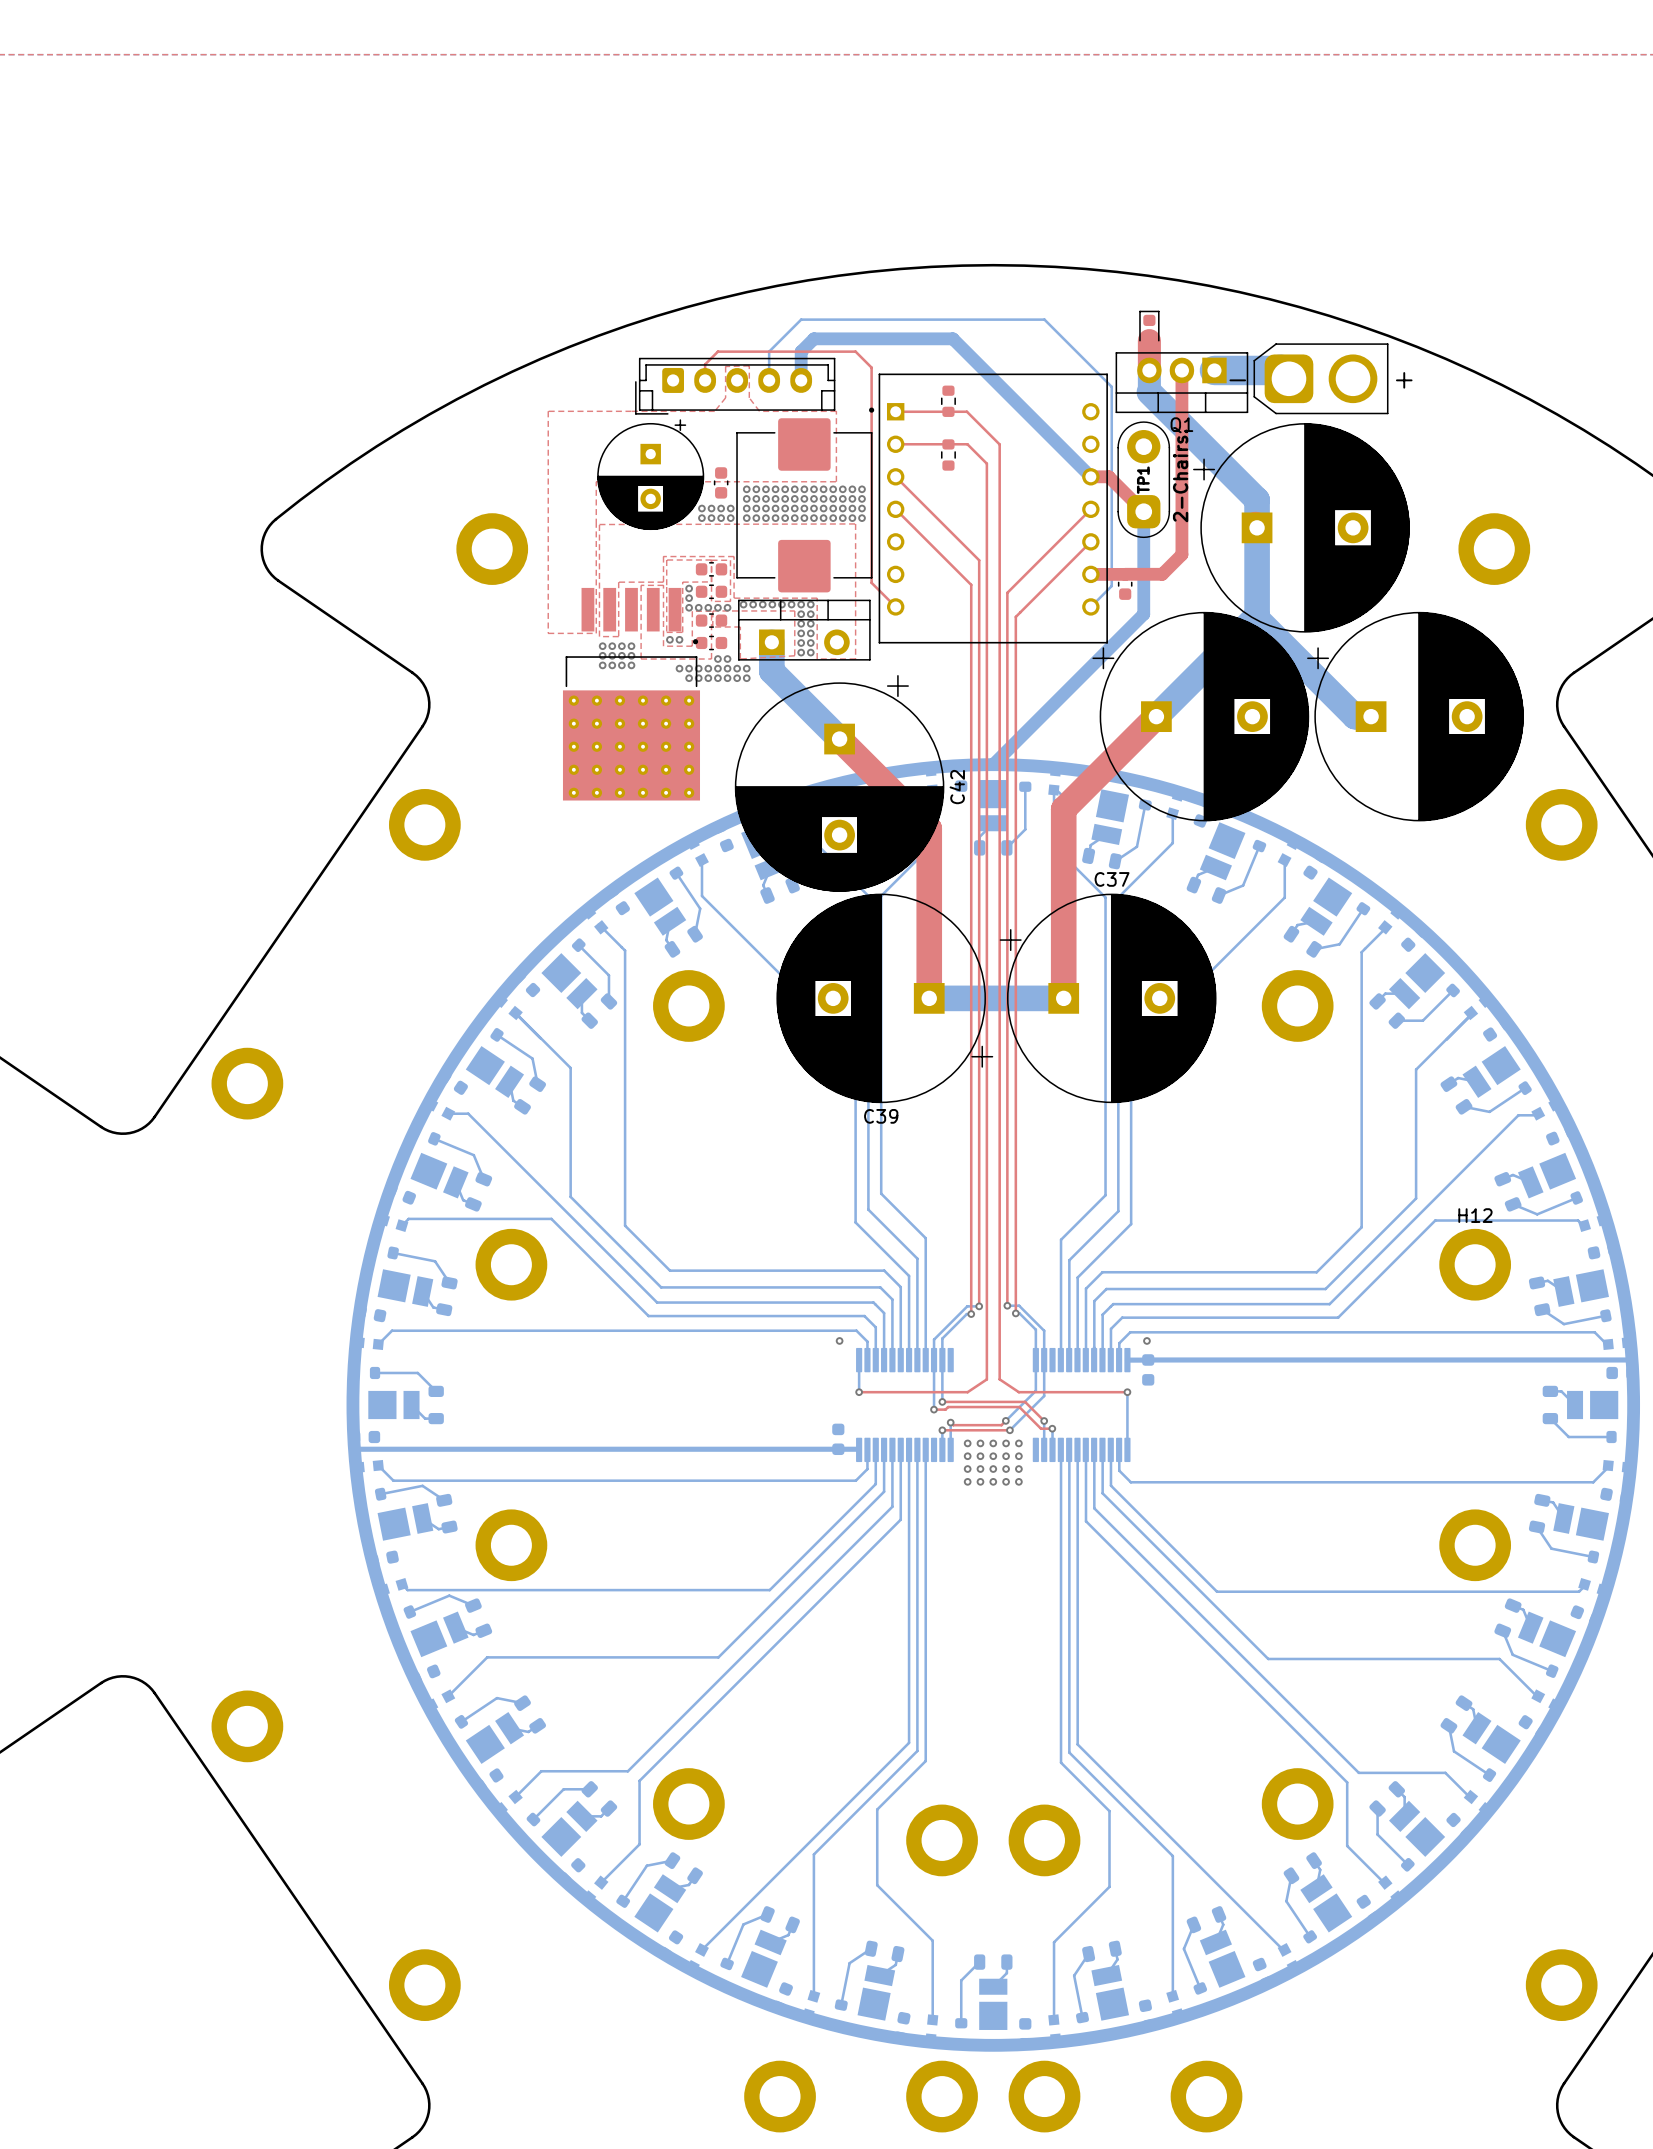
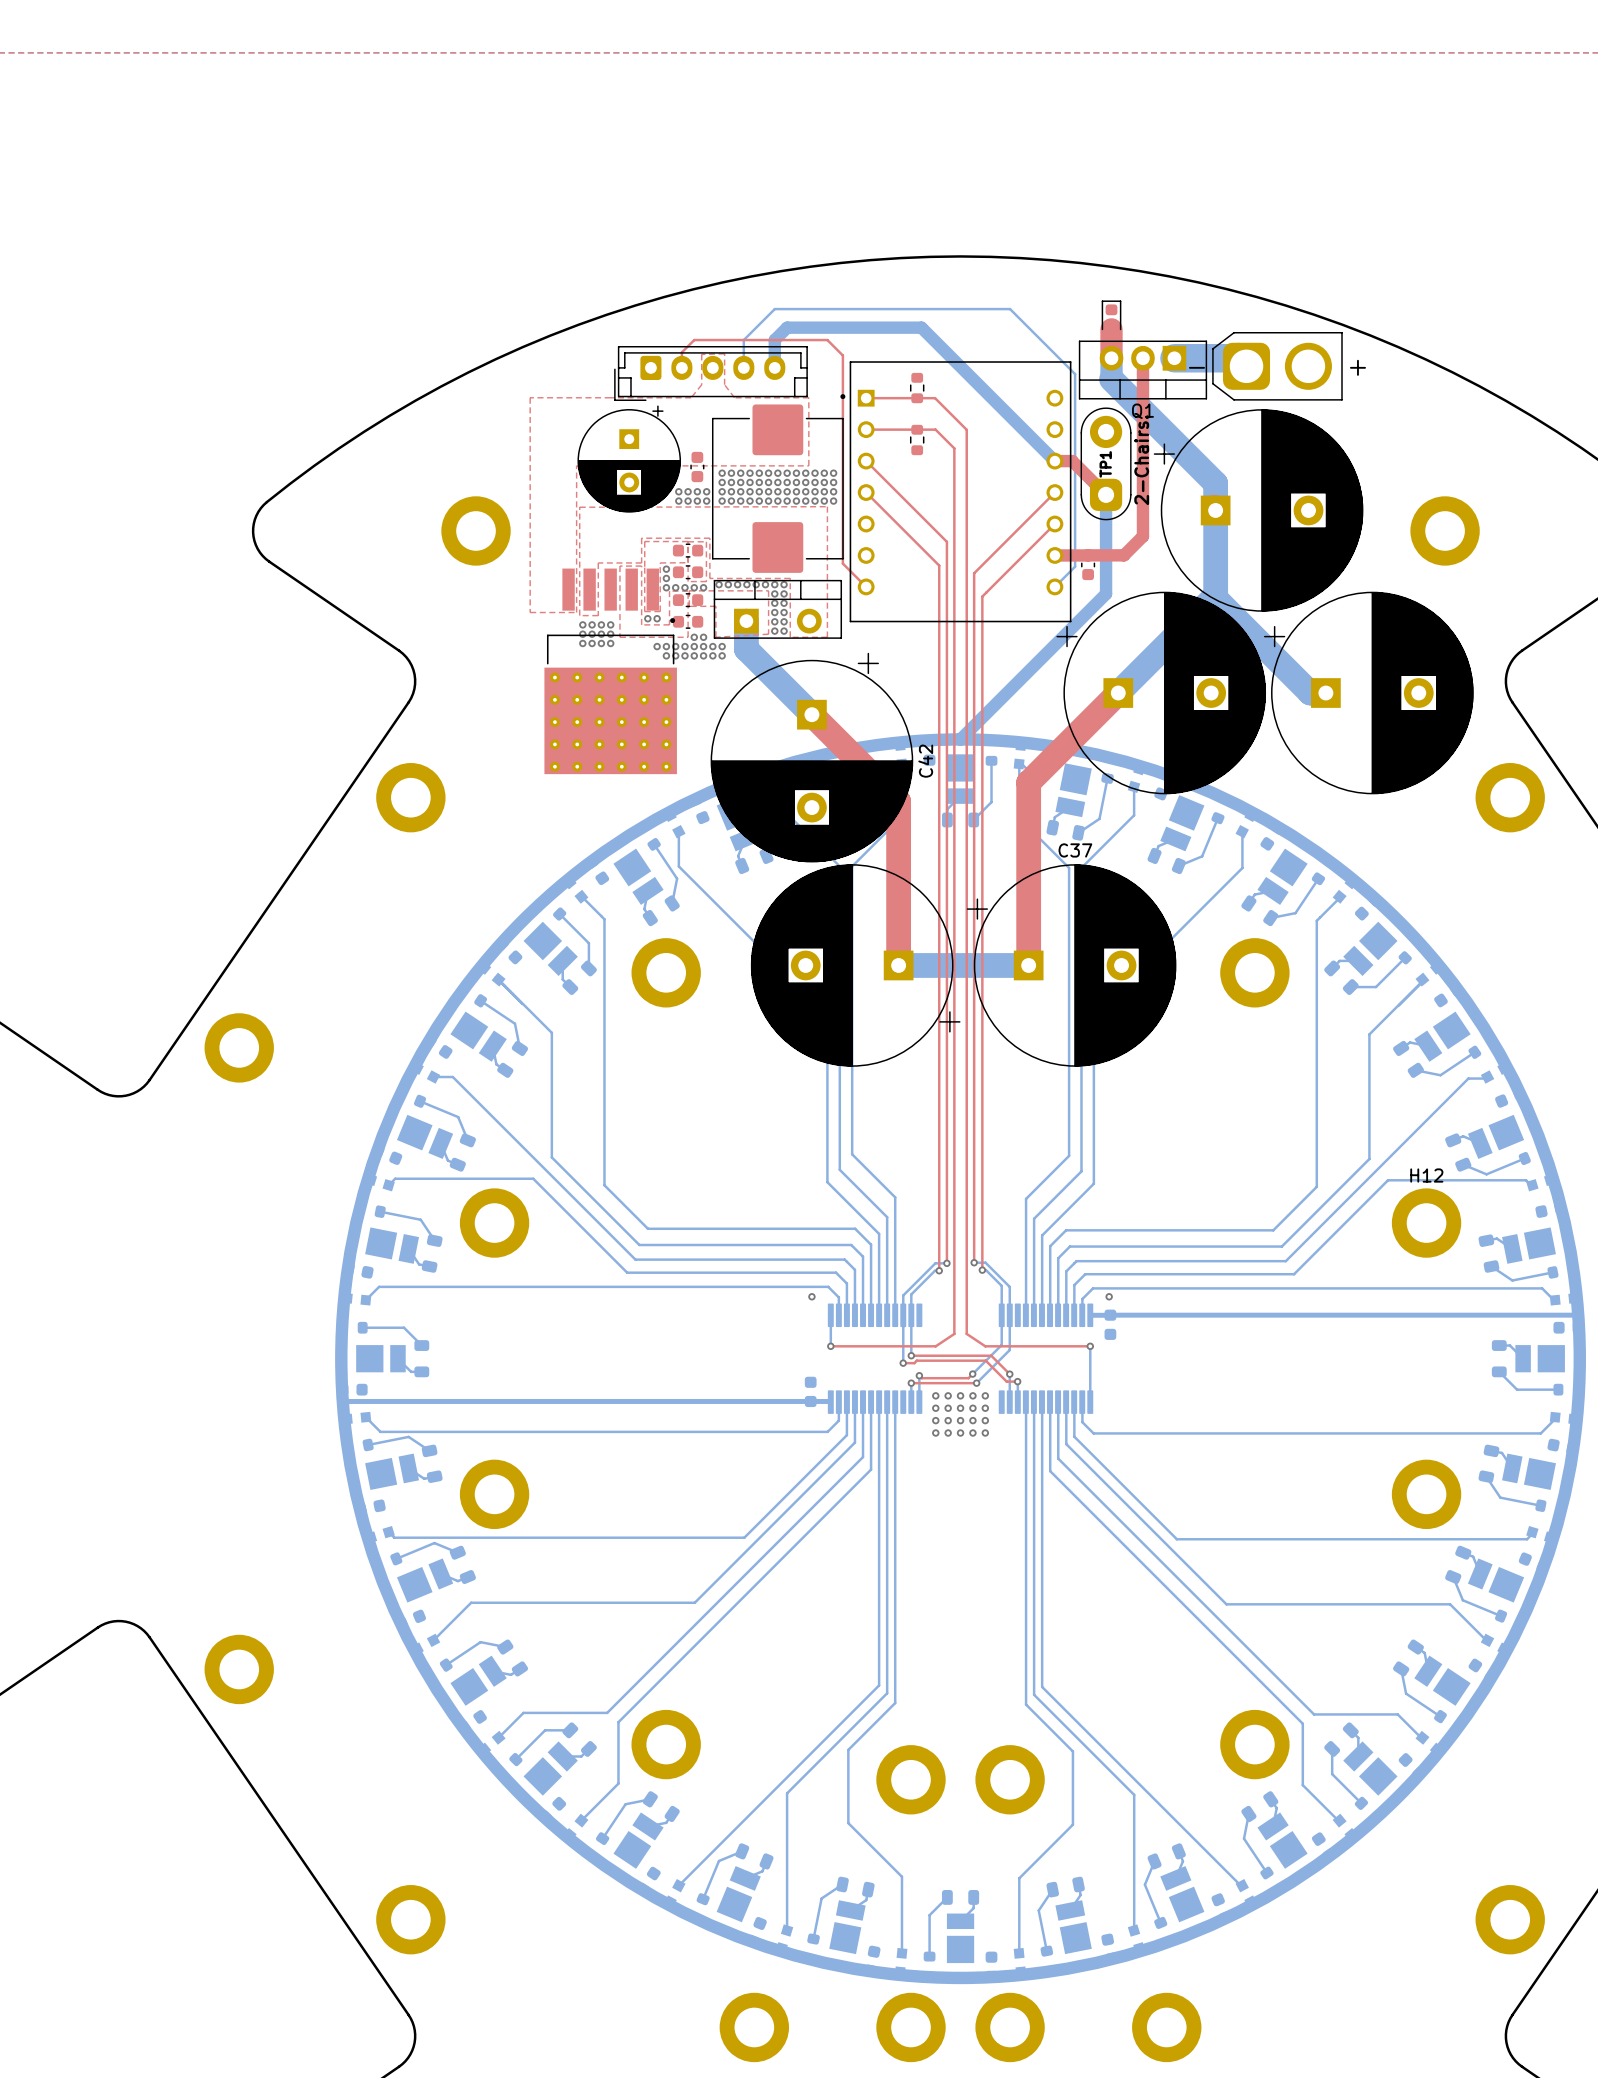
C39 name: C39 (881, 1116) -> none

